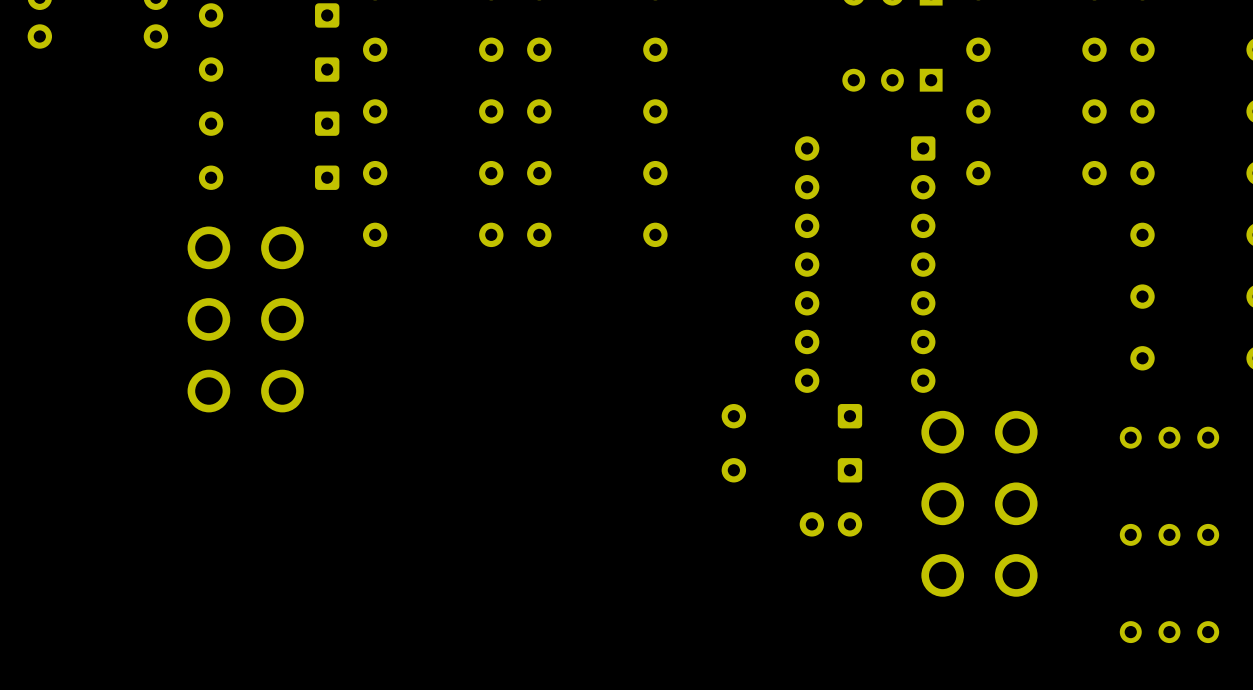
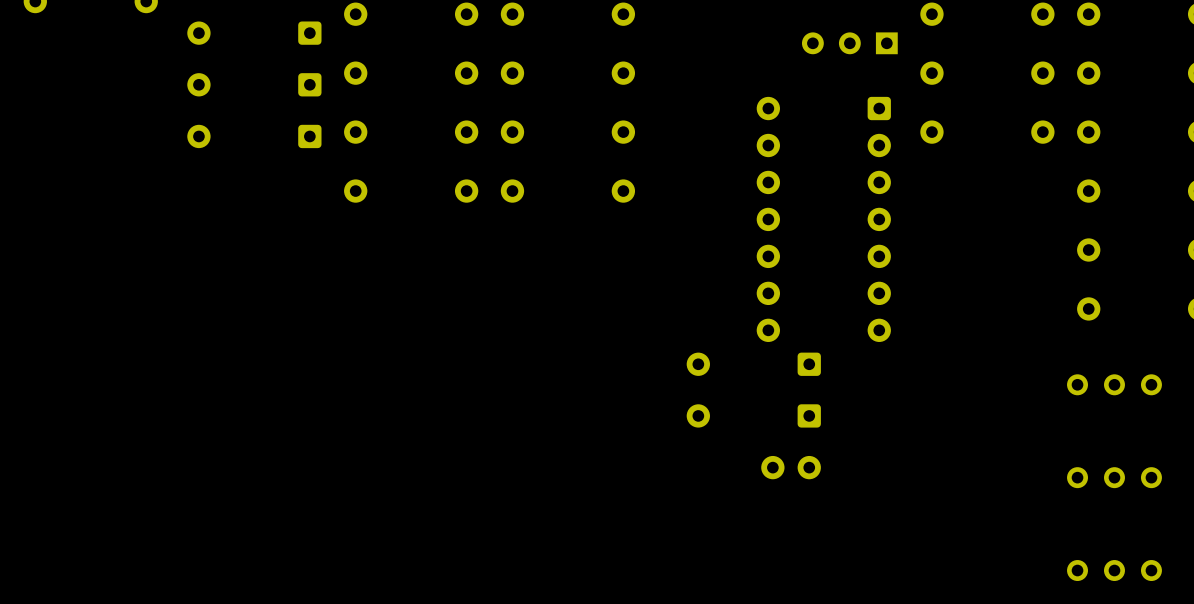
part: (245, 319) -> none
part: (979, 503) -> none

